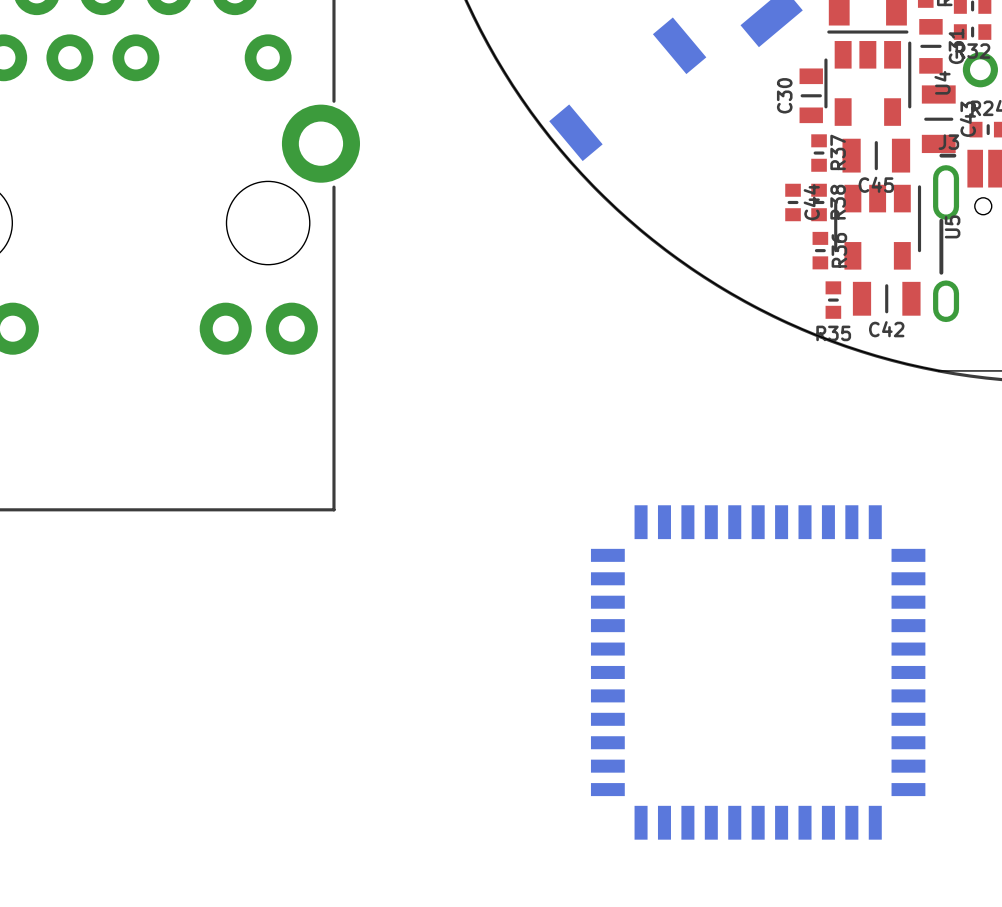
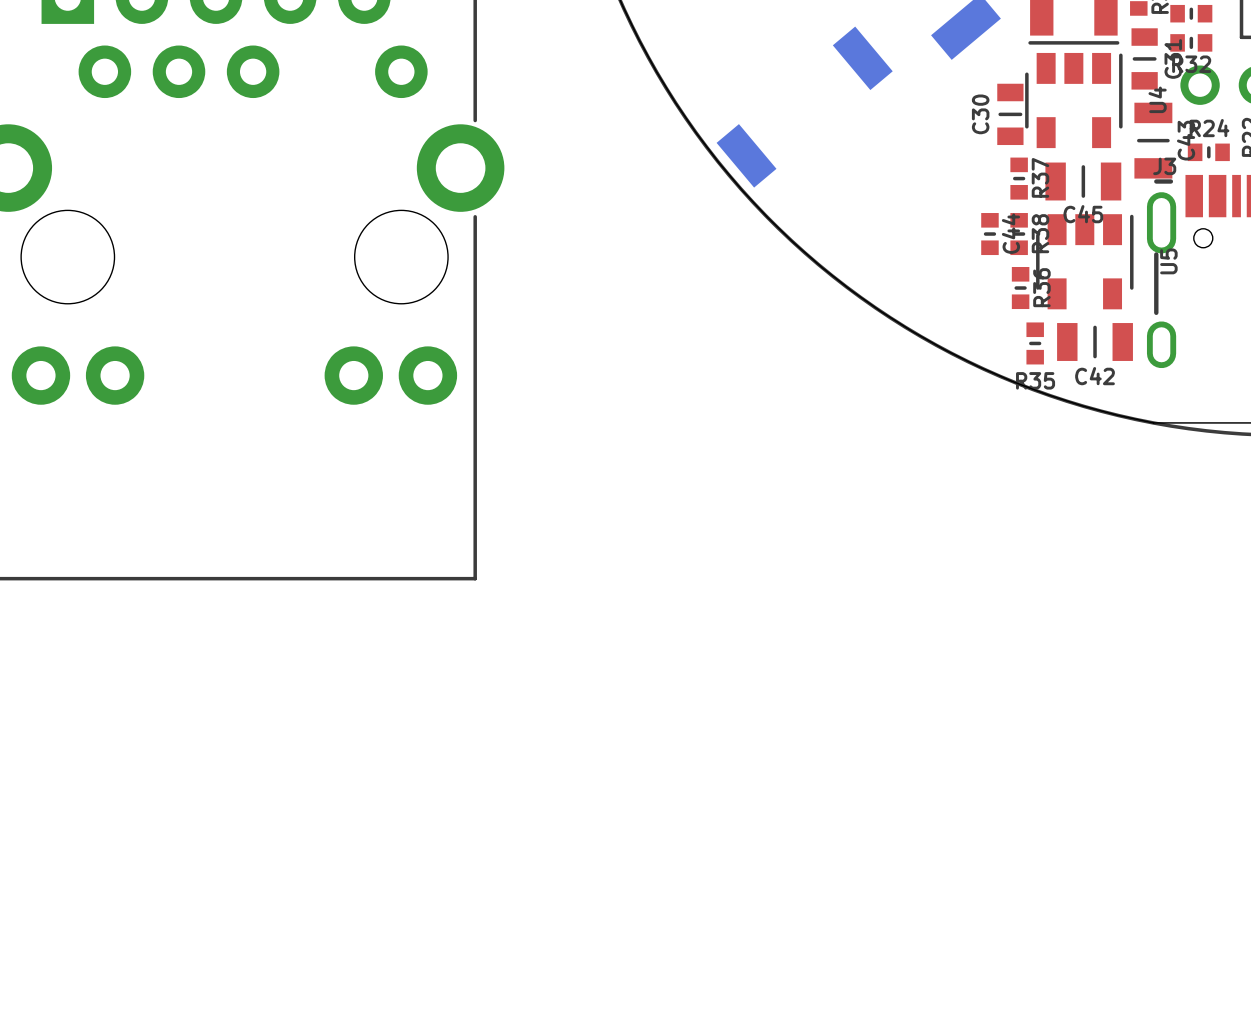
part: (758, 672) -> none

